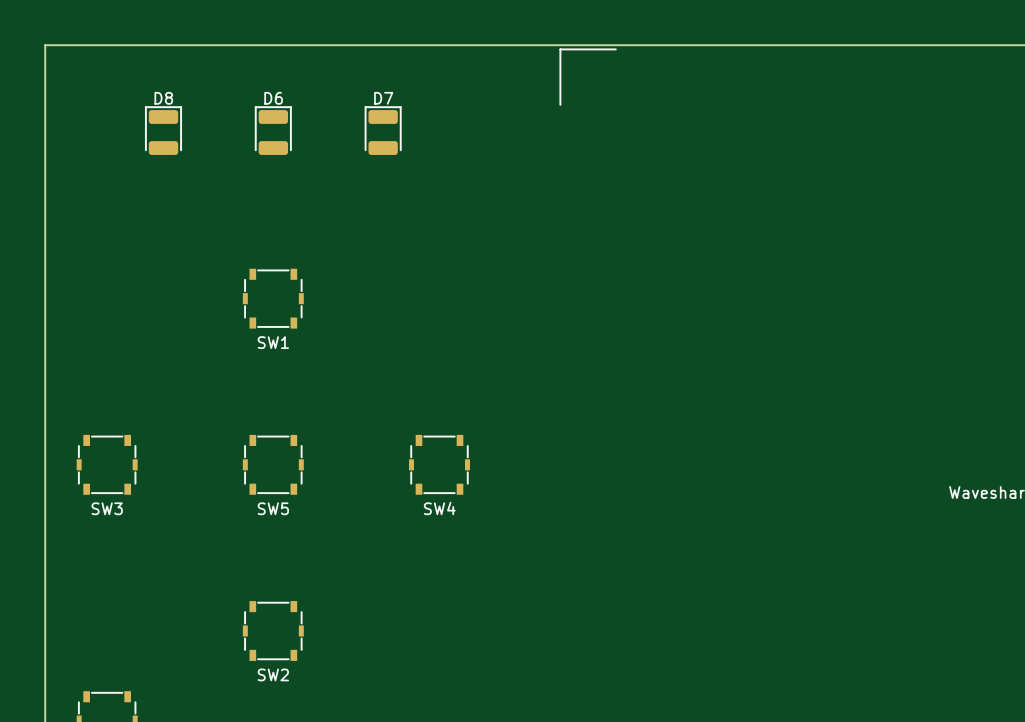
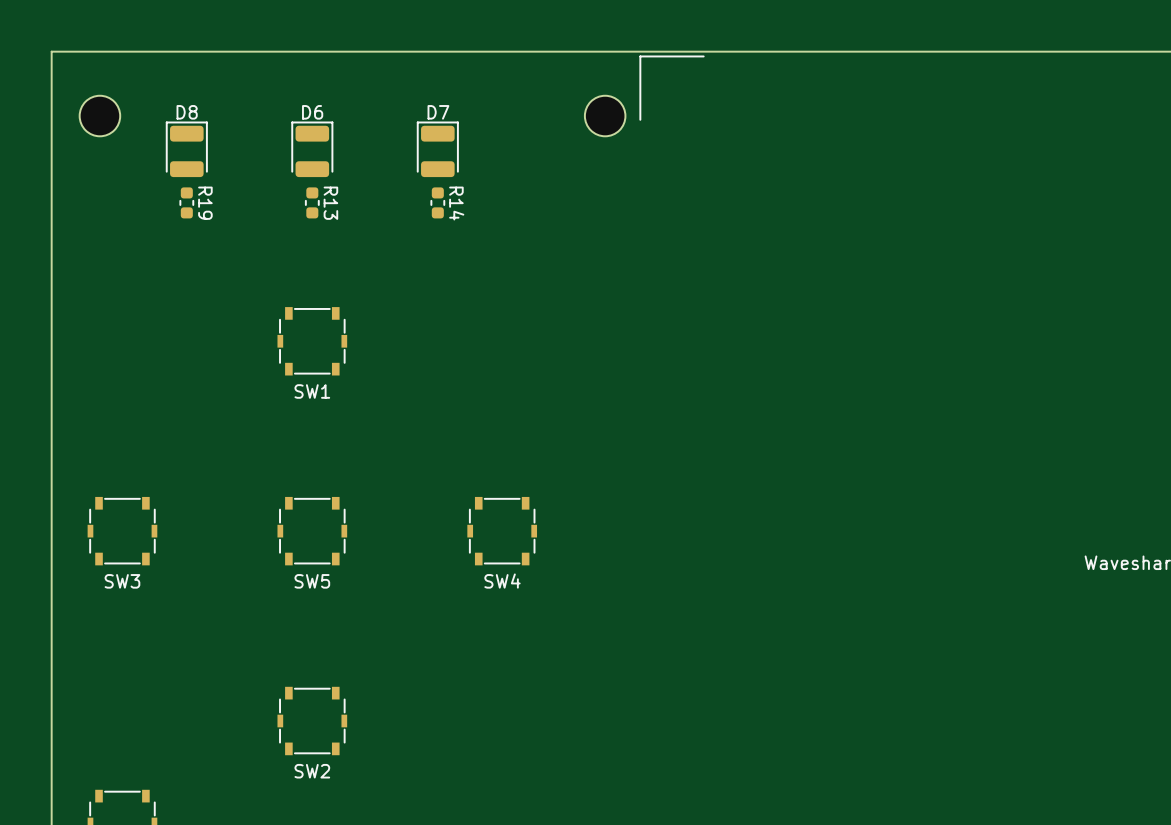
part: none -> (99, 116)
part: none -> (605, 116)
R19: none -> (186, 202)
R13: none -> (312, 202)
R14: none -> (437, 202)

